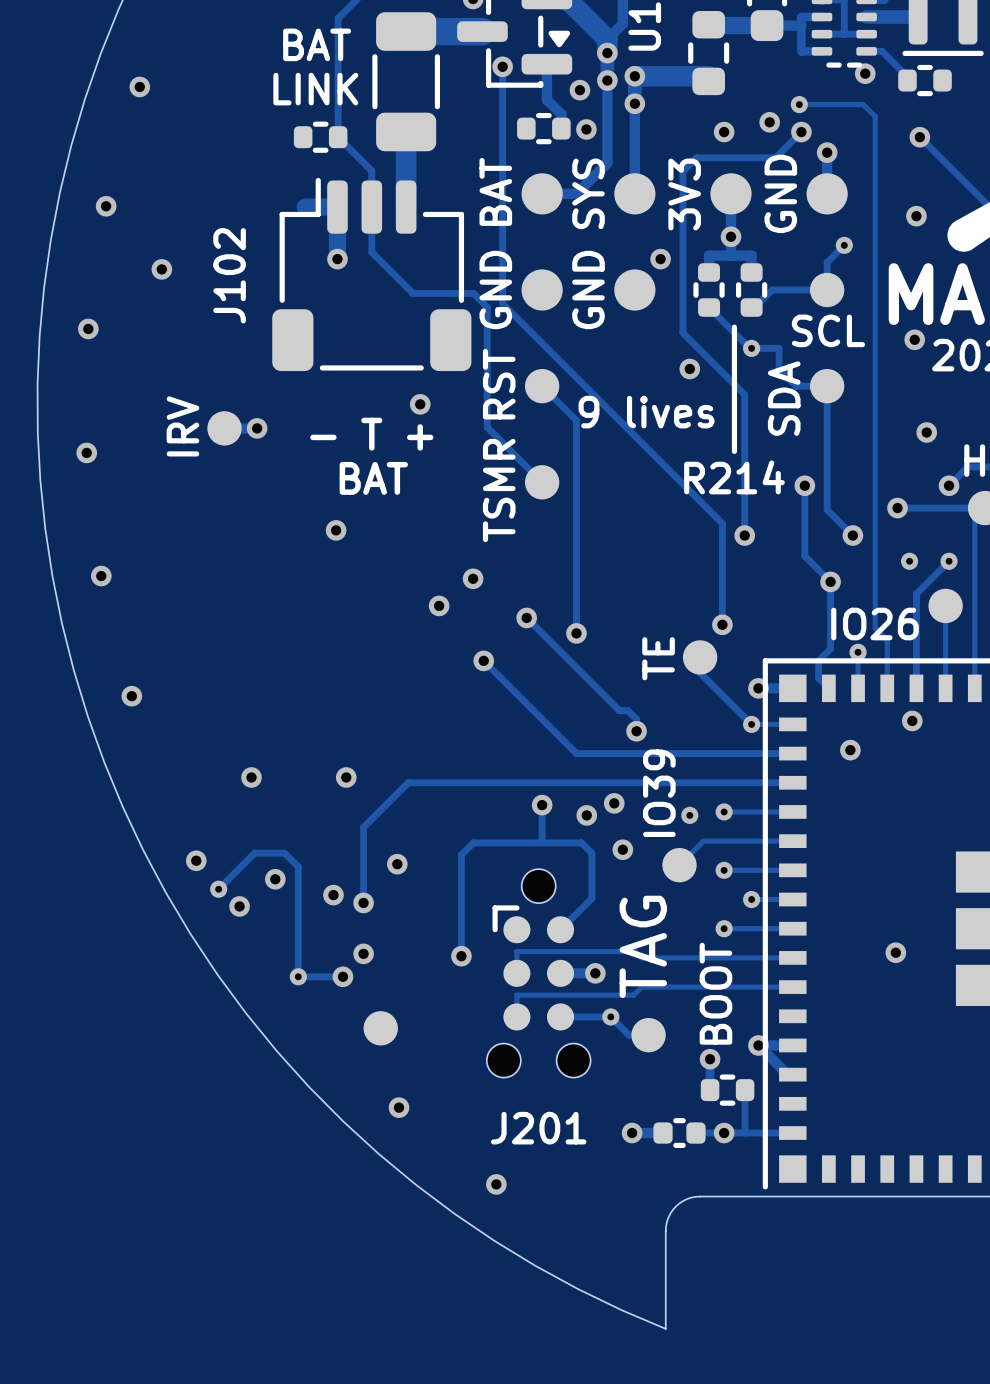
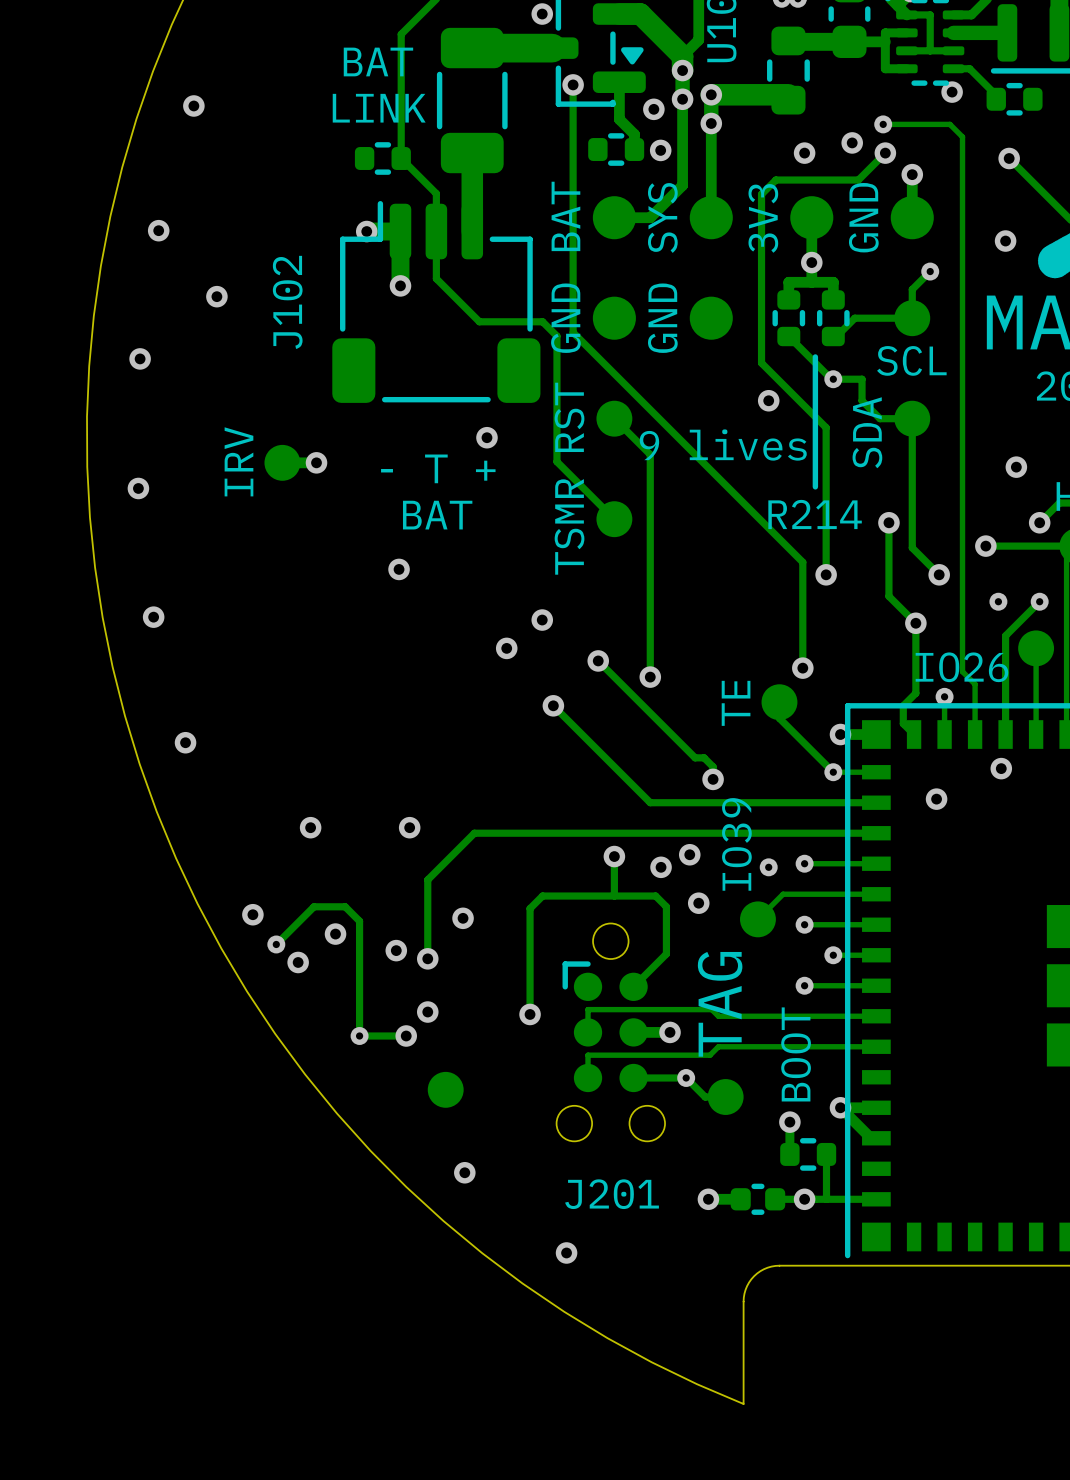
via: none -> (366, 231)
via: (660, 259) -> none
via: (914, 339) -> none
via: (895, 952) -> none

